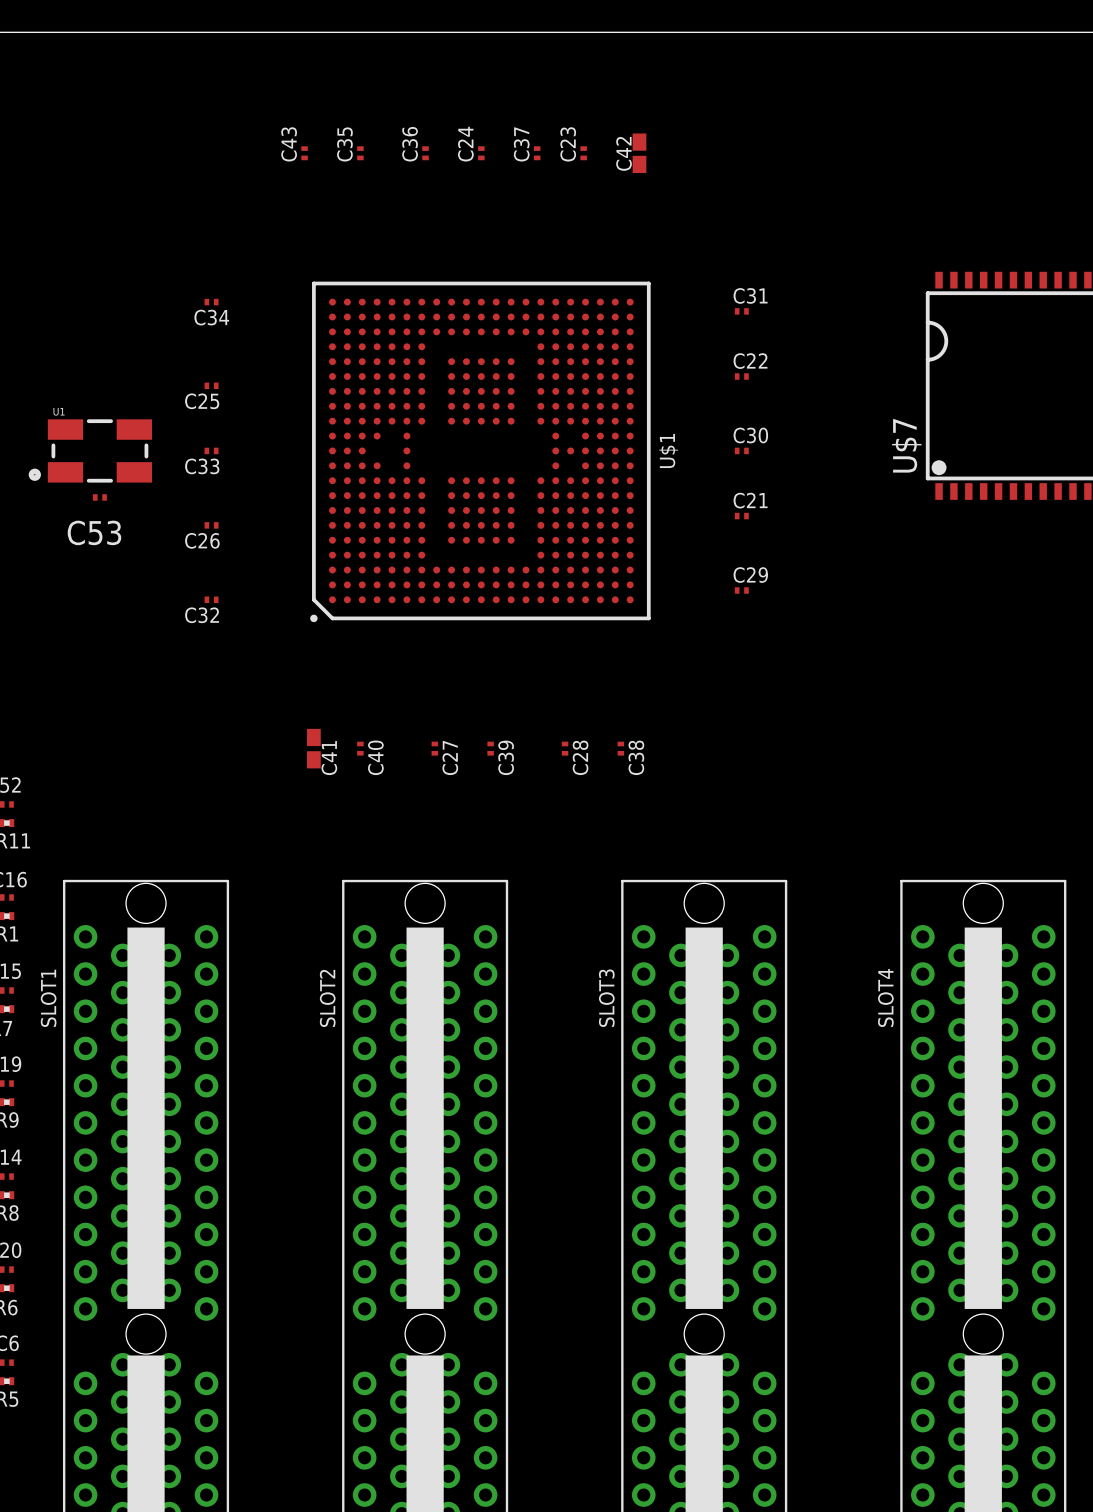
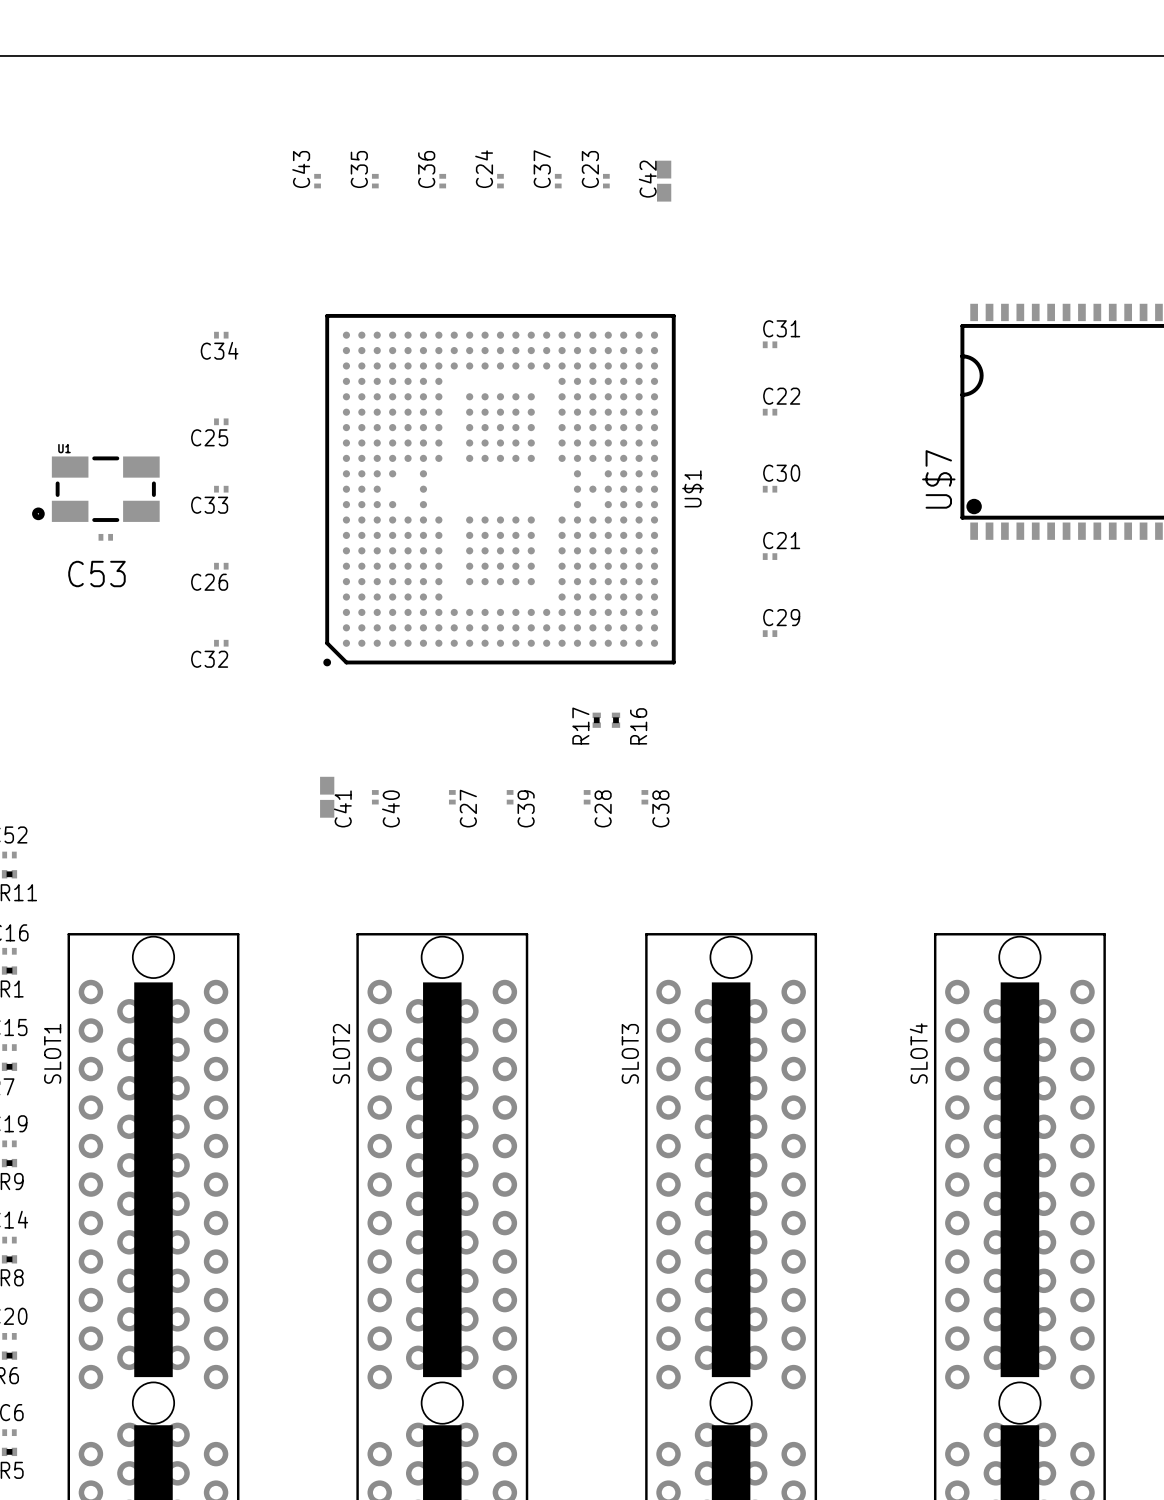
R17: none -> (596, 720)
R16: none -> (615, 720)

